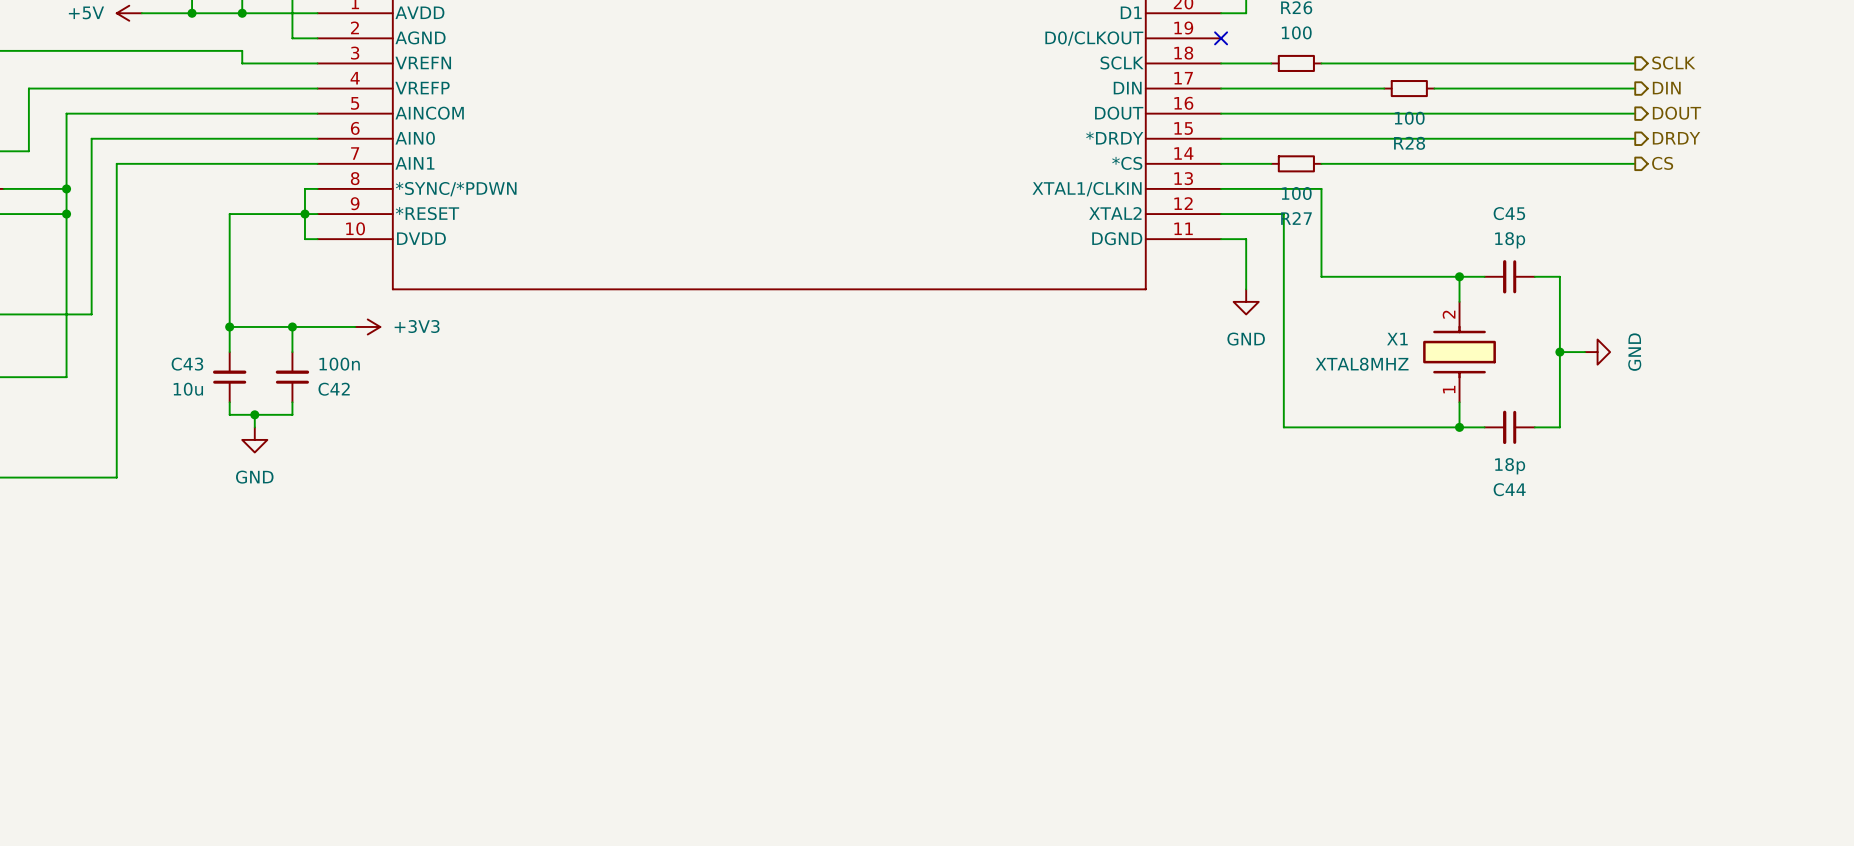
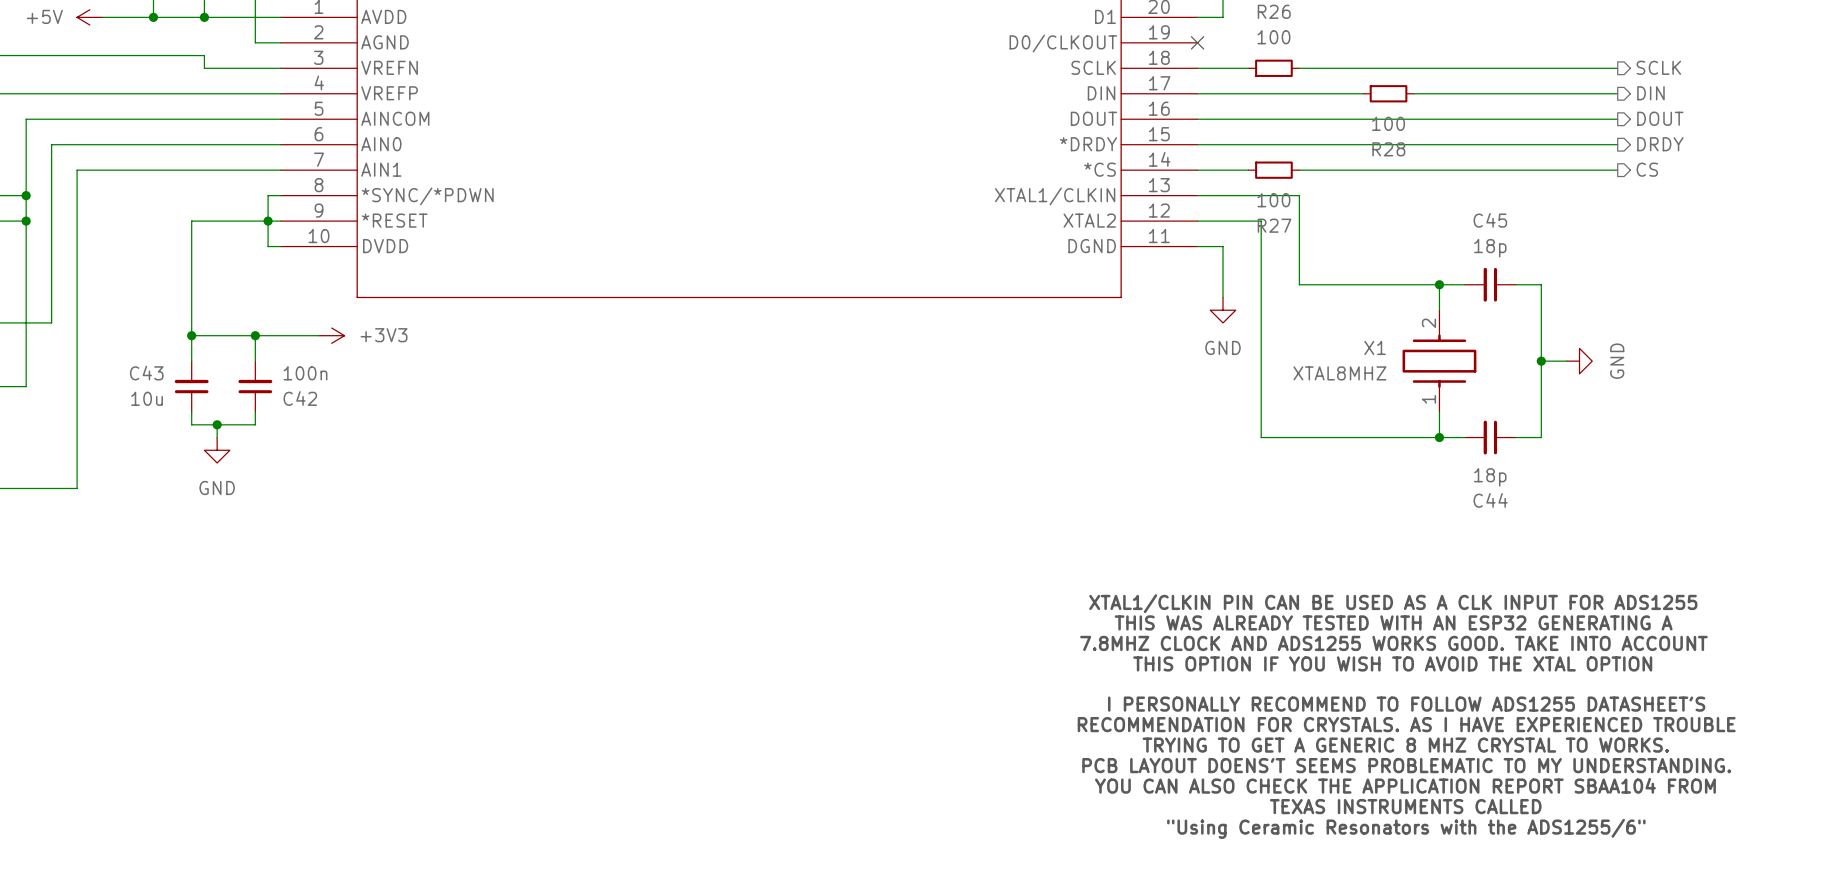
text: none -> XTAL1/CLKIN PIN CAN BE USED AS A CLK INPUT FOR ADS1255 (1393, 603)
text: none -> THIS WAS ALREADY TESTED WITH AN ESP32 GENERATING A (1393, 622)
text: none -> 7.8MHZ CLOCK AND ADS1255 WORKS GOOD. TAKE INTO ACCOUNT (1393, 643)
text: none -> THIS OPTION IF YOU WISH TO AVOID THE XTAL OPTION (1392, 663)
text: none -> I PERSONALLY RECOMMEND TO FOLLOW ADS1255 DATASHEET'S (1406, 704)
text: none -> RECOMMENDATION FOR CRYSTALS. AS I HAVE EXPERIENCED TROUBLE (1406, 724)
text: none -> TRYING TO GET A GENERIC 8 MHZ CRYSTAL TO WORKS. (1405, 745)
text: none -> PCB LAYOUT DOENS'T SEEMS PROBLEMATIC TO MY UNDERSTANDING. (1406, 765)
text: none -> YOU CAN ALSO CHECK THE APPLICATION REPORT SBAA104 FROM (1405, 785)
text: none -> TEXAS INSTRUMENTS CALLED (1405, 806)
text: none -> "Using Ceramic Resonators with the ADS1255/6" (1406, 828)

